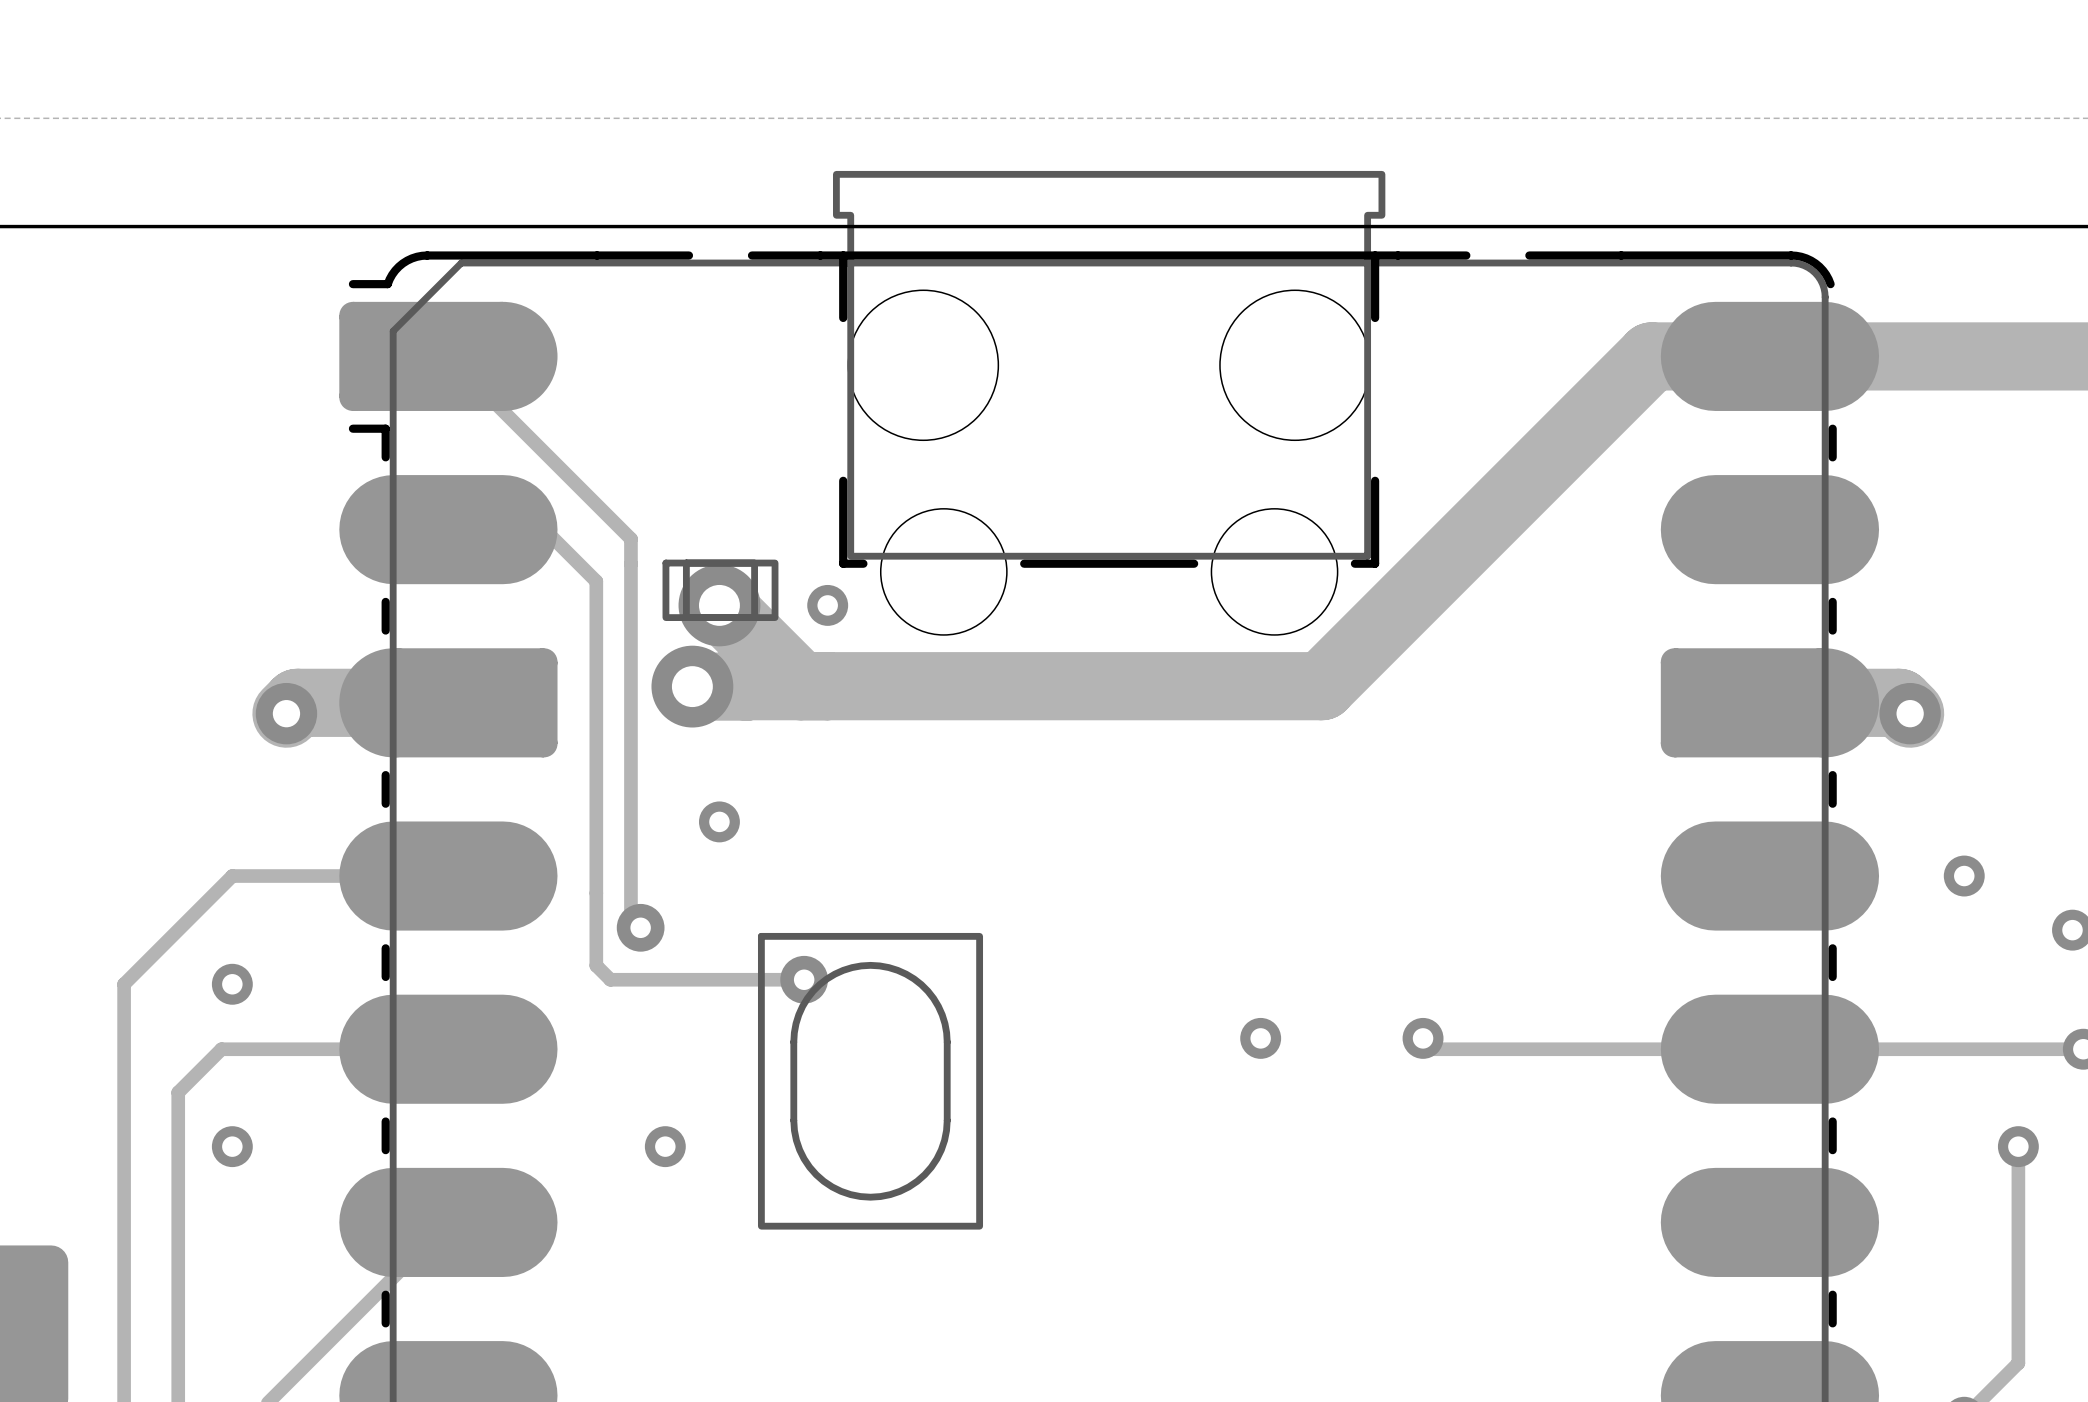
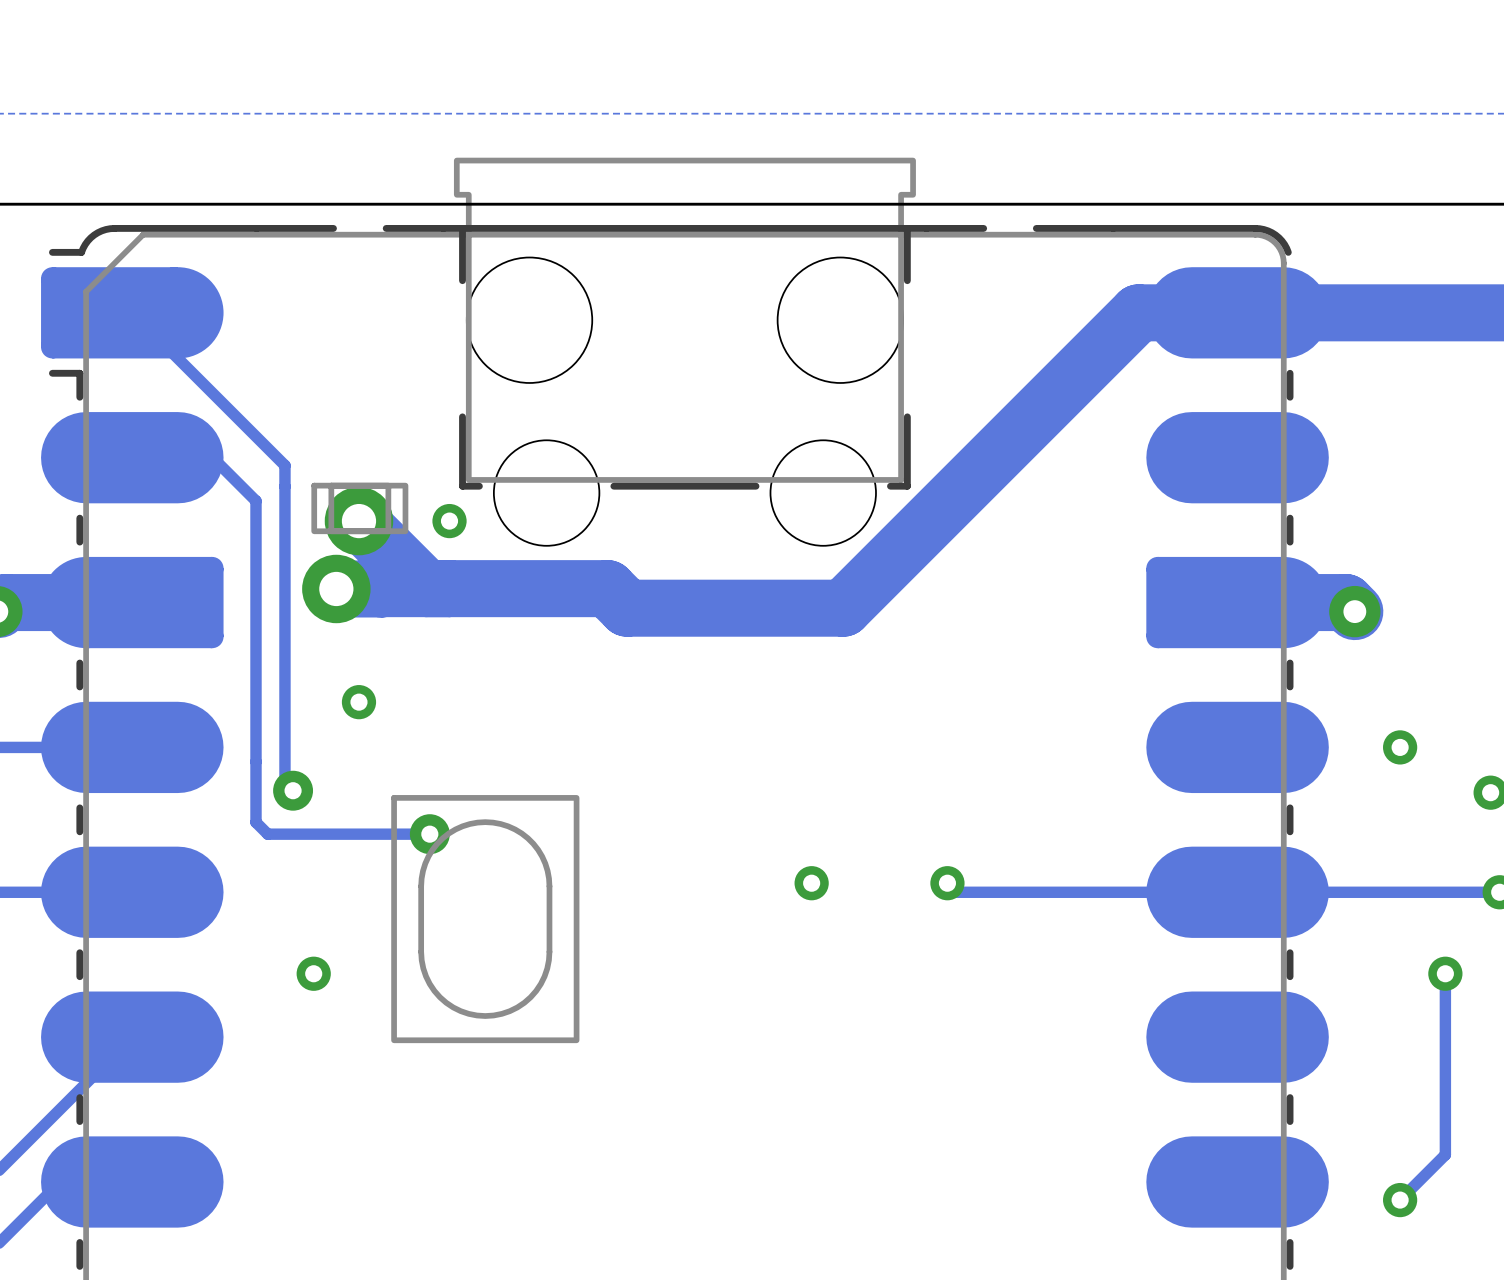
track: (1321, 686) (1016, 686) -> (862, 588) (843, 608) (627, 608) (607, 588)

